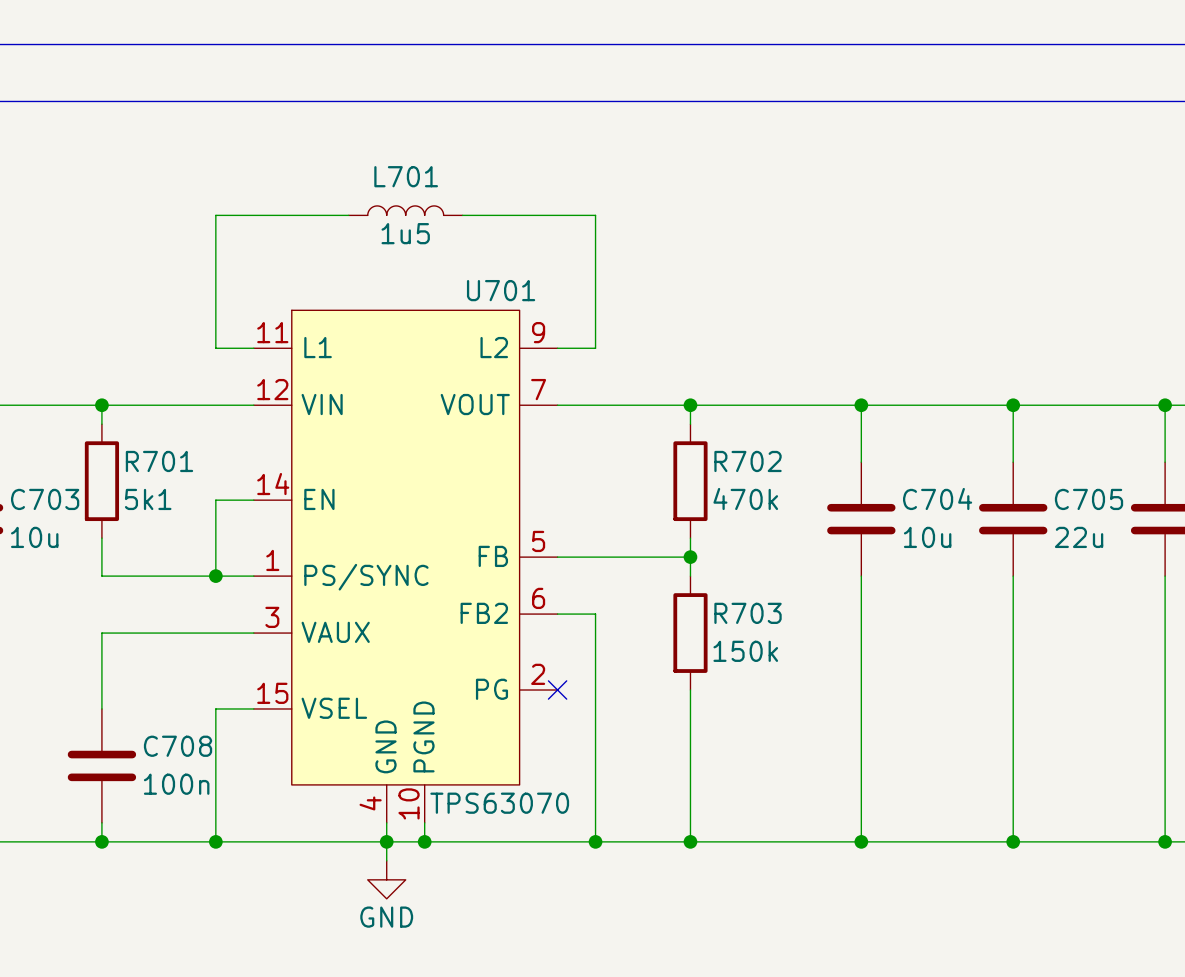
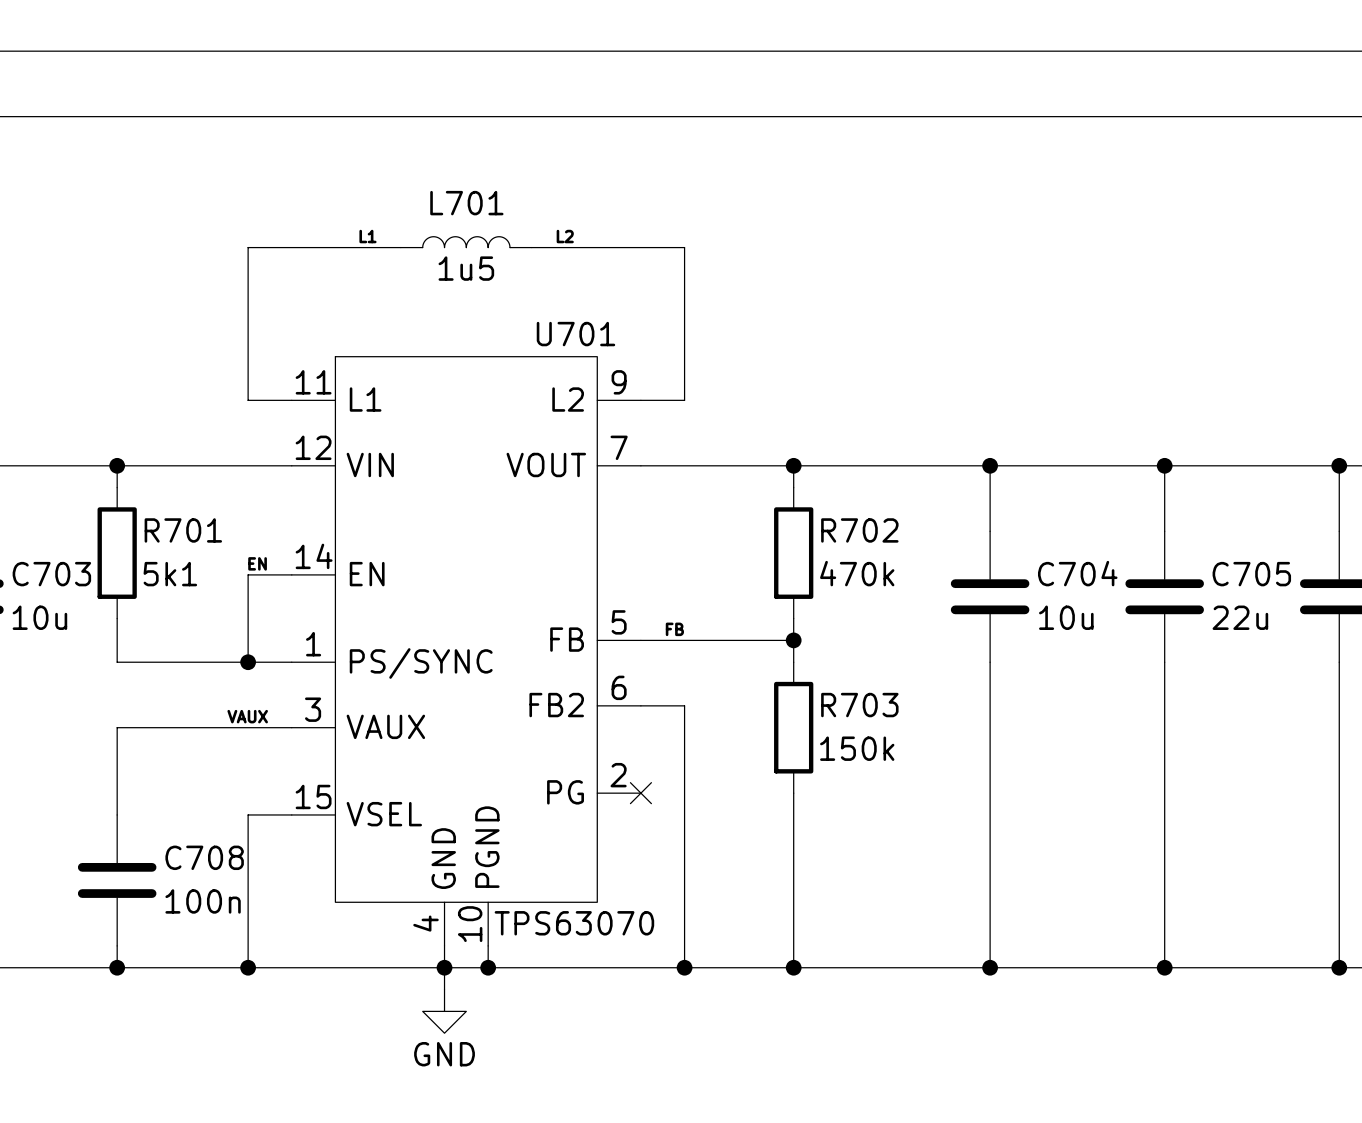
label: none -> L1 (367, 236)
label: none -> L2 (565, 236)
label: none -> EN (257, 563)
label: none -> FB (674, 629)
label: none -> VAUX (247, 716)

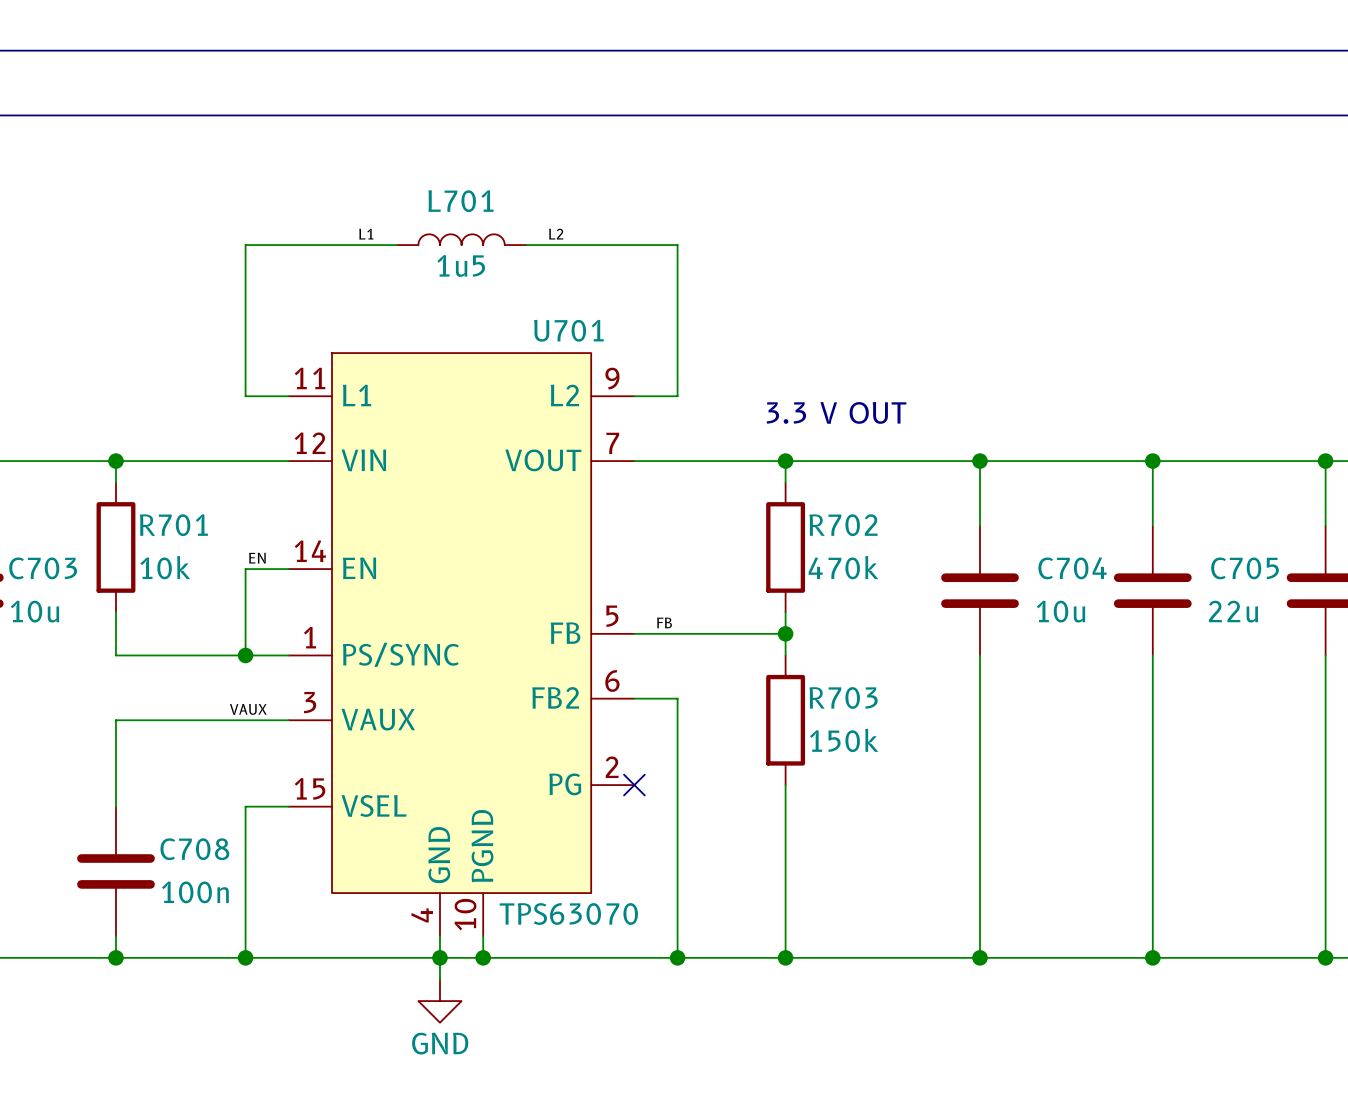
text: none -> 3.3 V OUT (836, 412)
R701 value: 5k1 (170, 574) -> 10k (165, 567)

